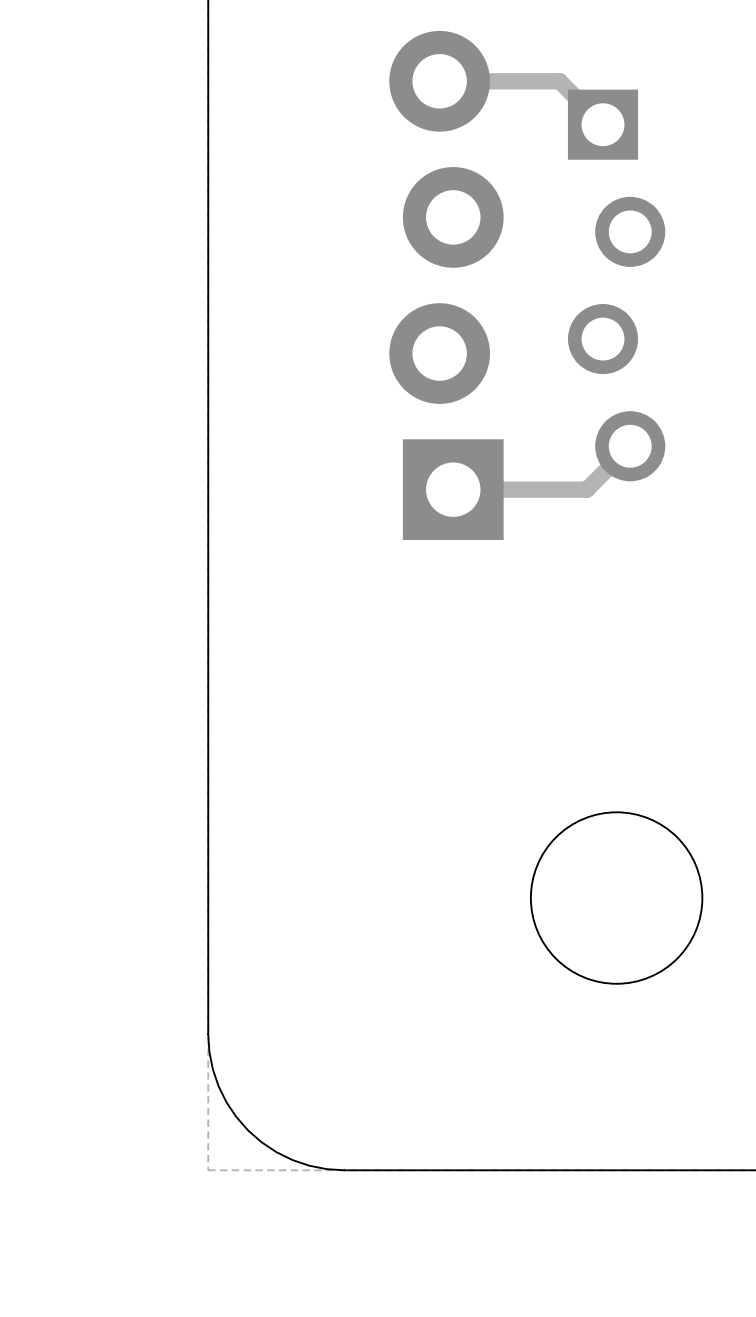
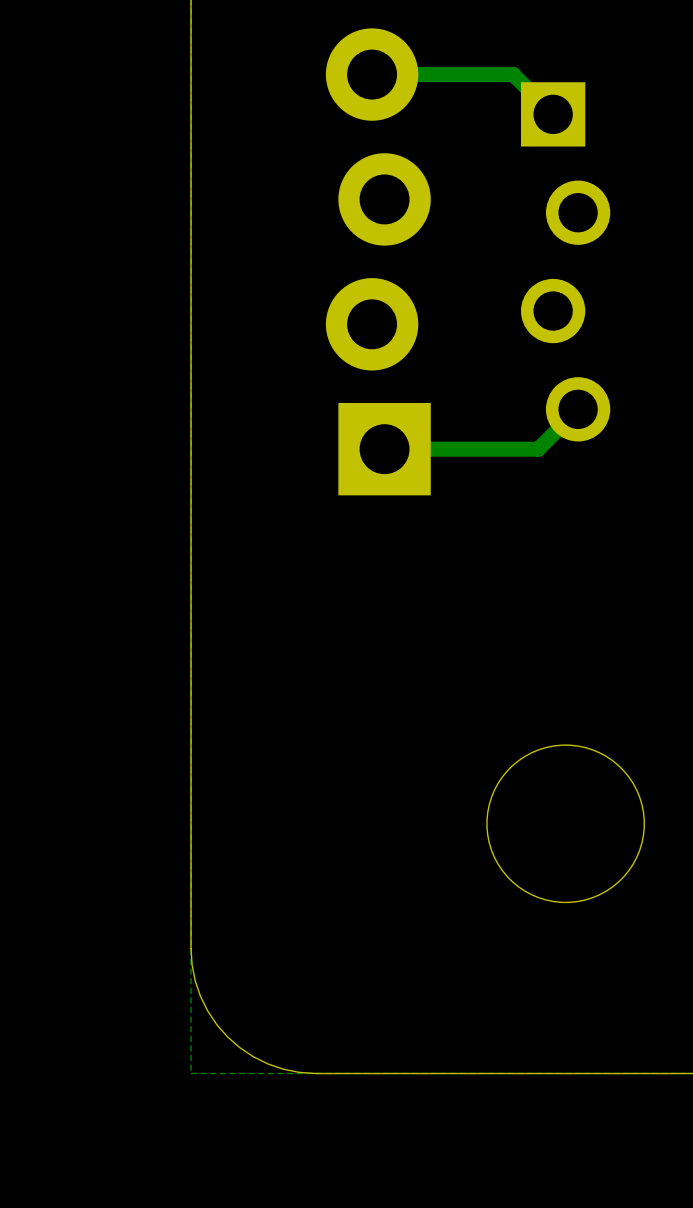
part position: (446, 285) -> (378, 261)

